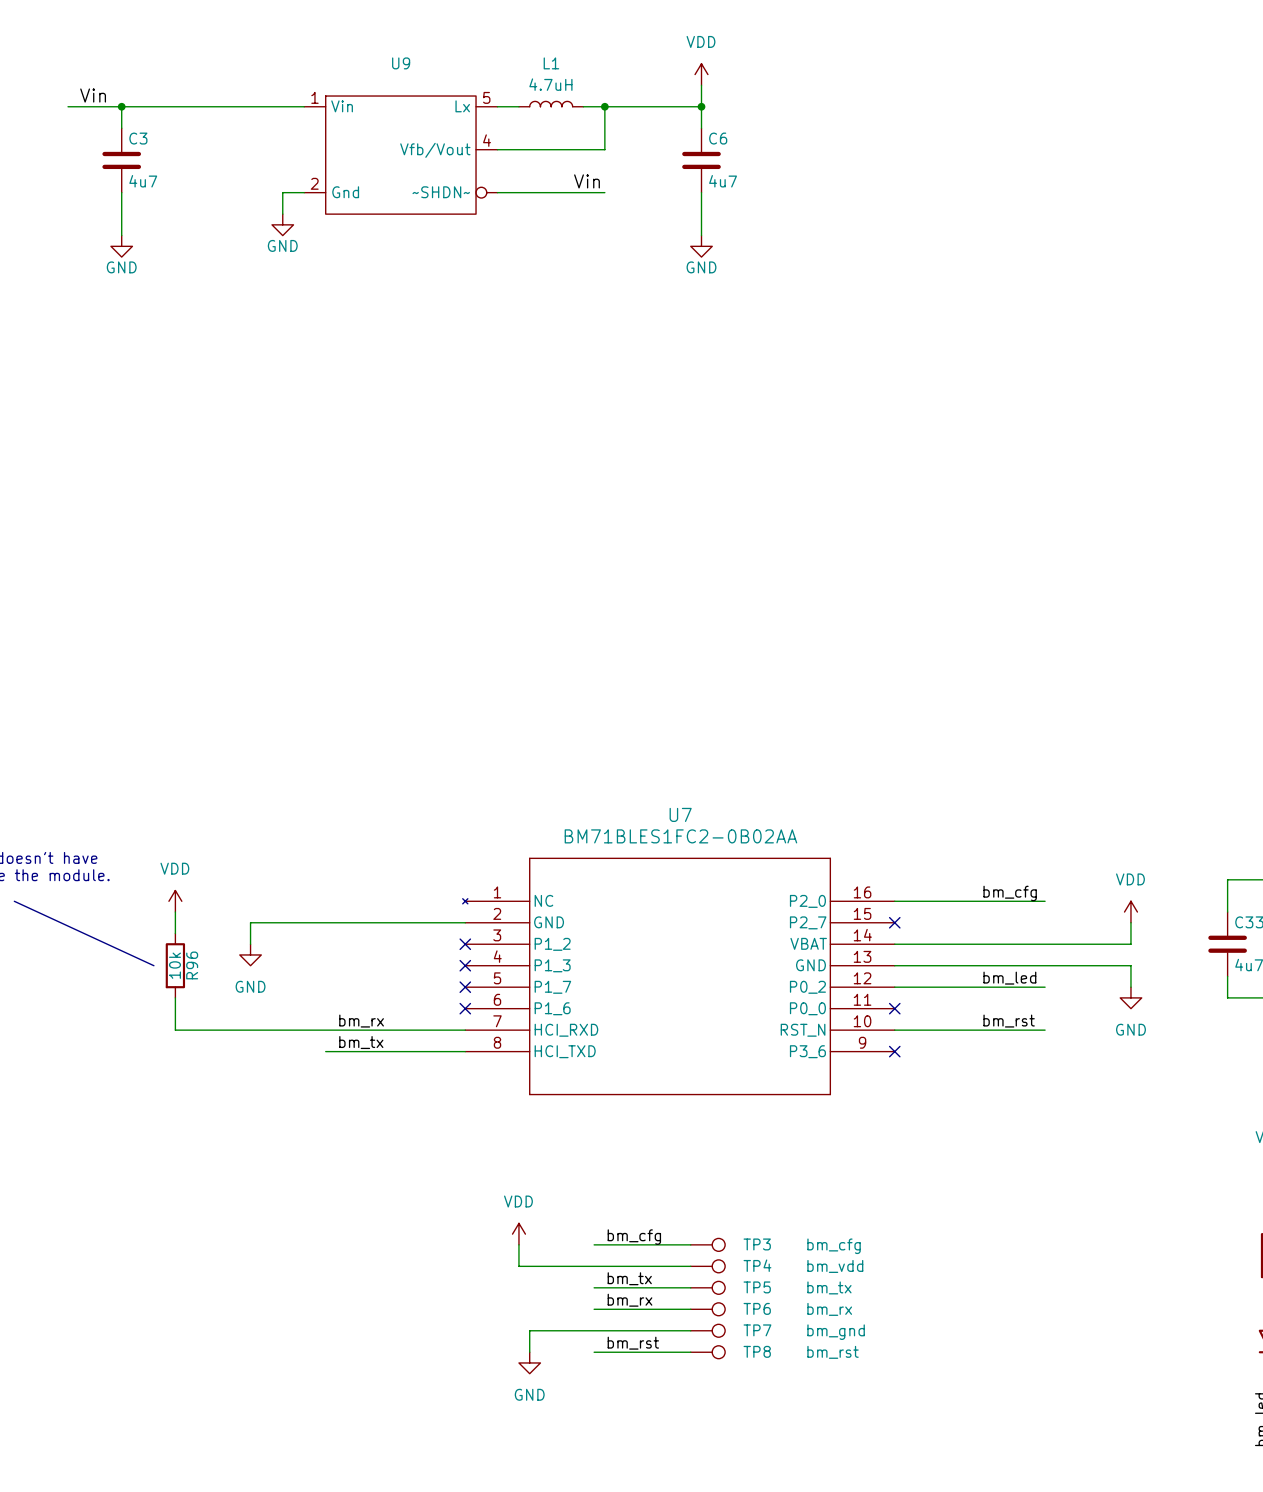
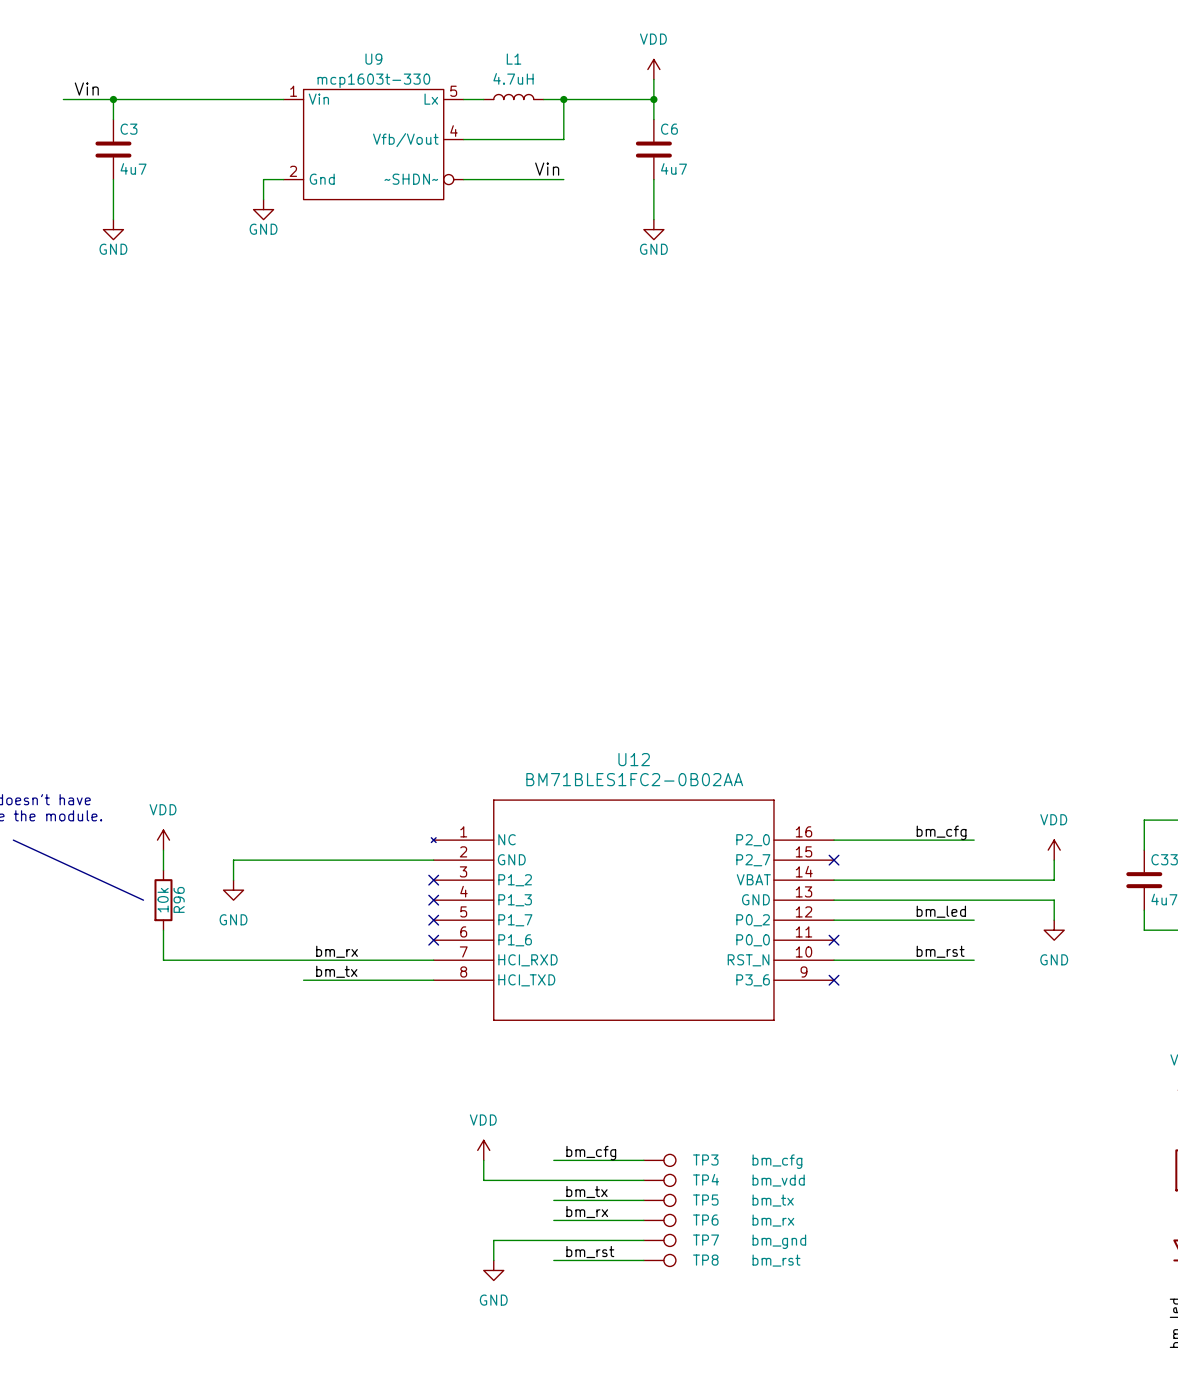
U9 value: none -> mcp1603t-330 (373, 80)
U7 name: U7 (680, 814) -> U12 (634, 759)

